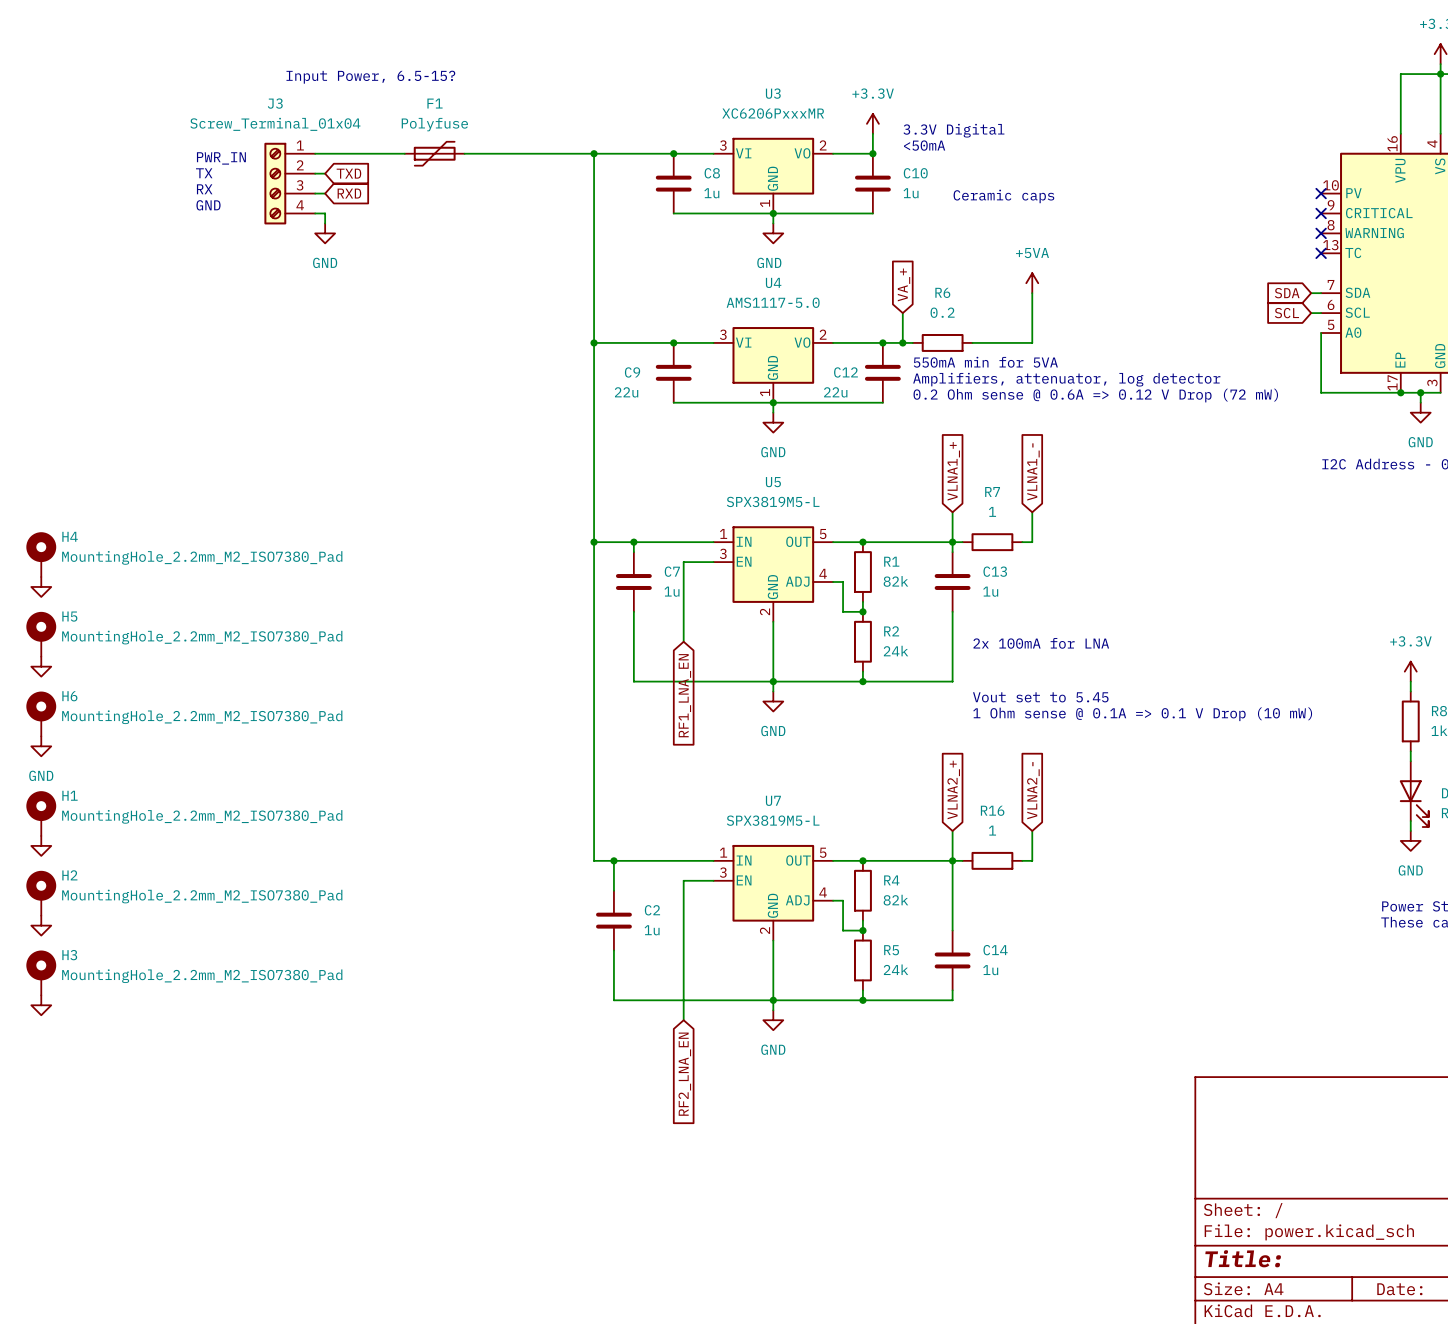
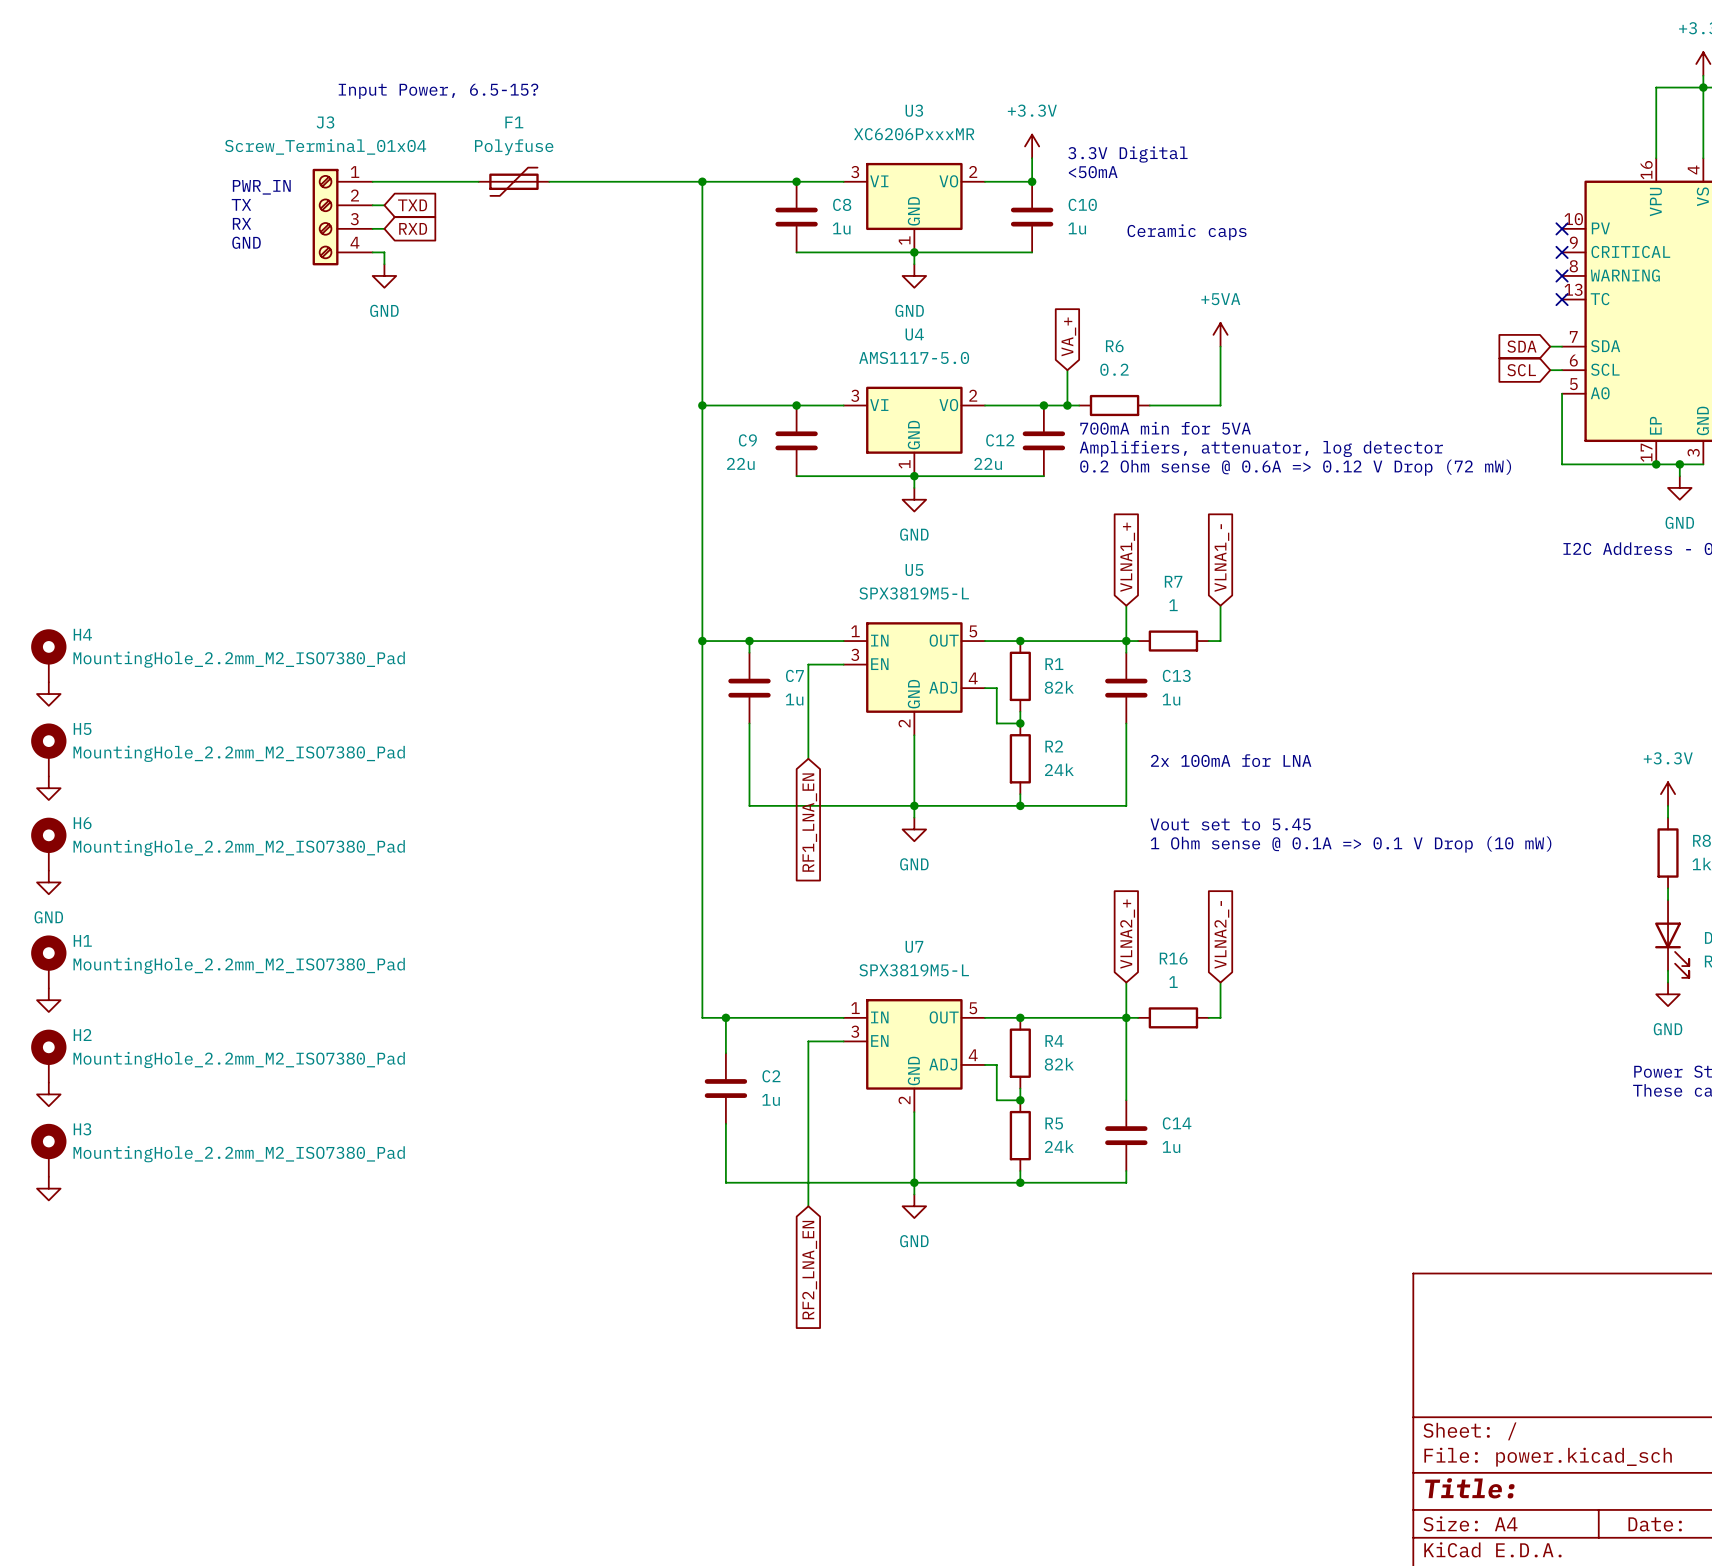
text: 550mA min for 5VA (985, 362) -> 700mA min for 5VA (1165, 428)

